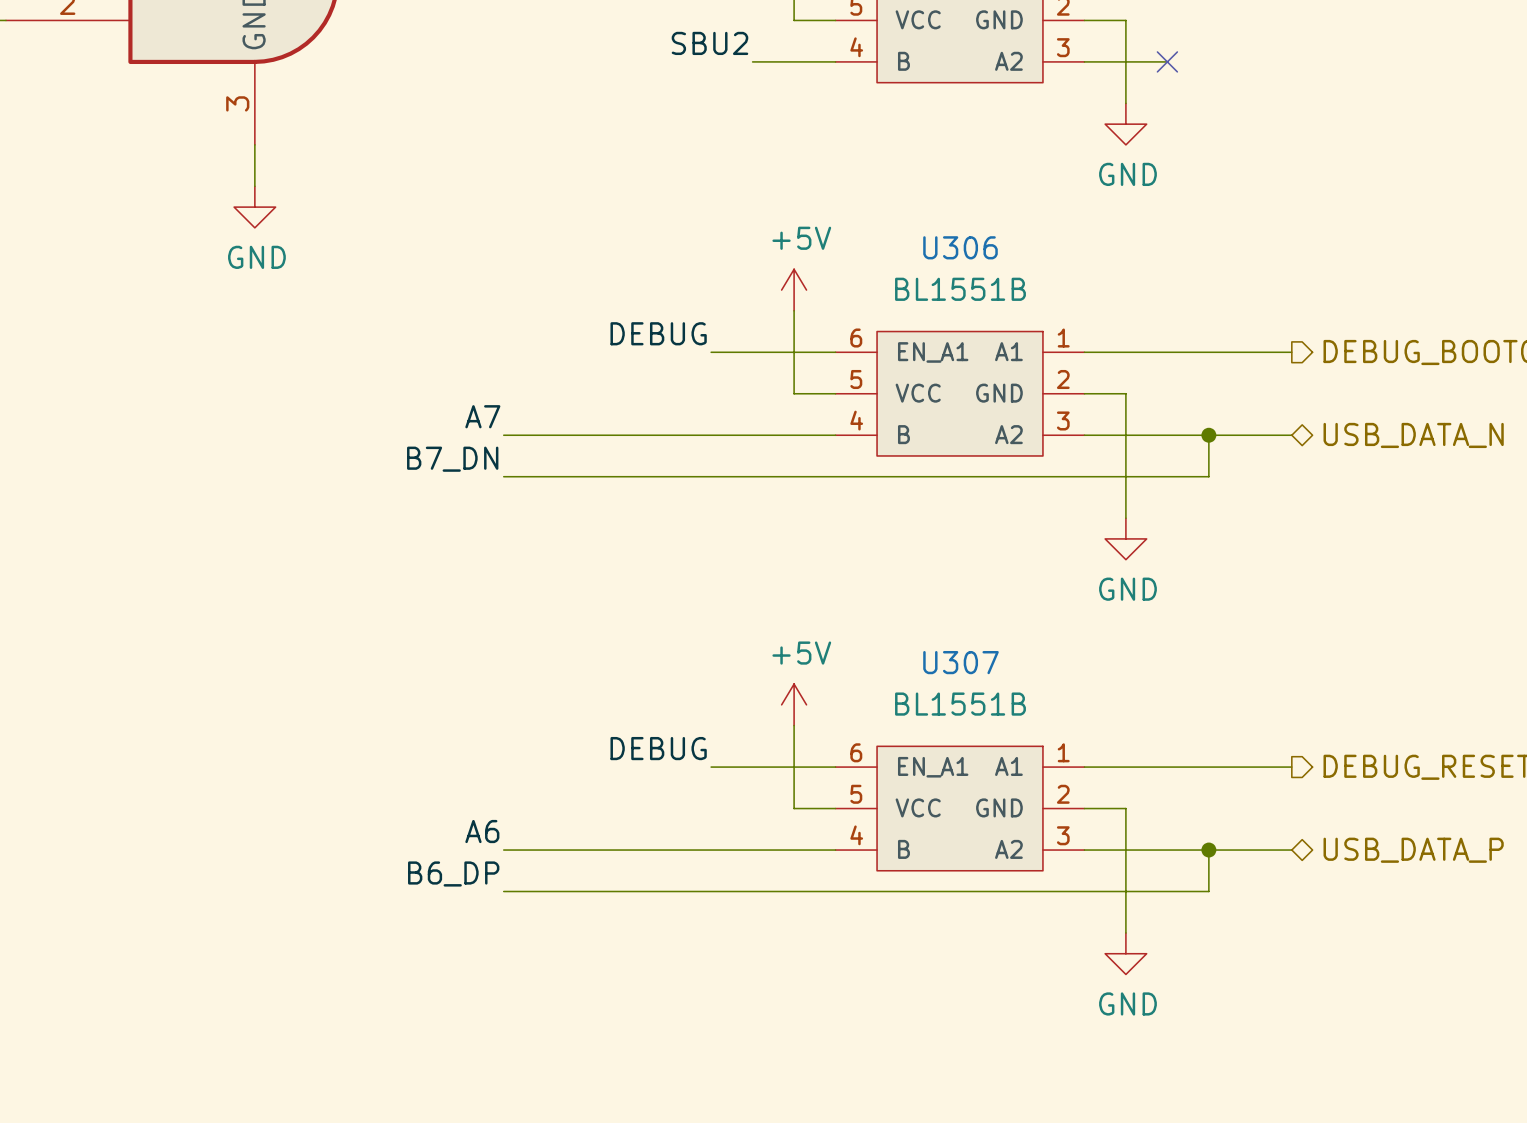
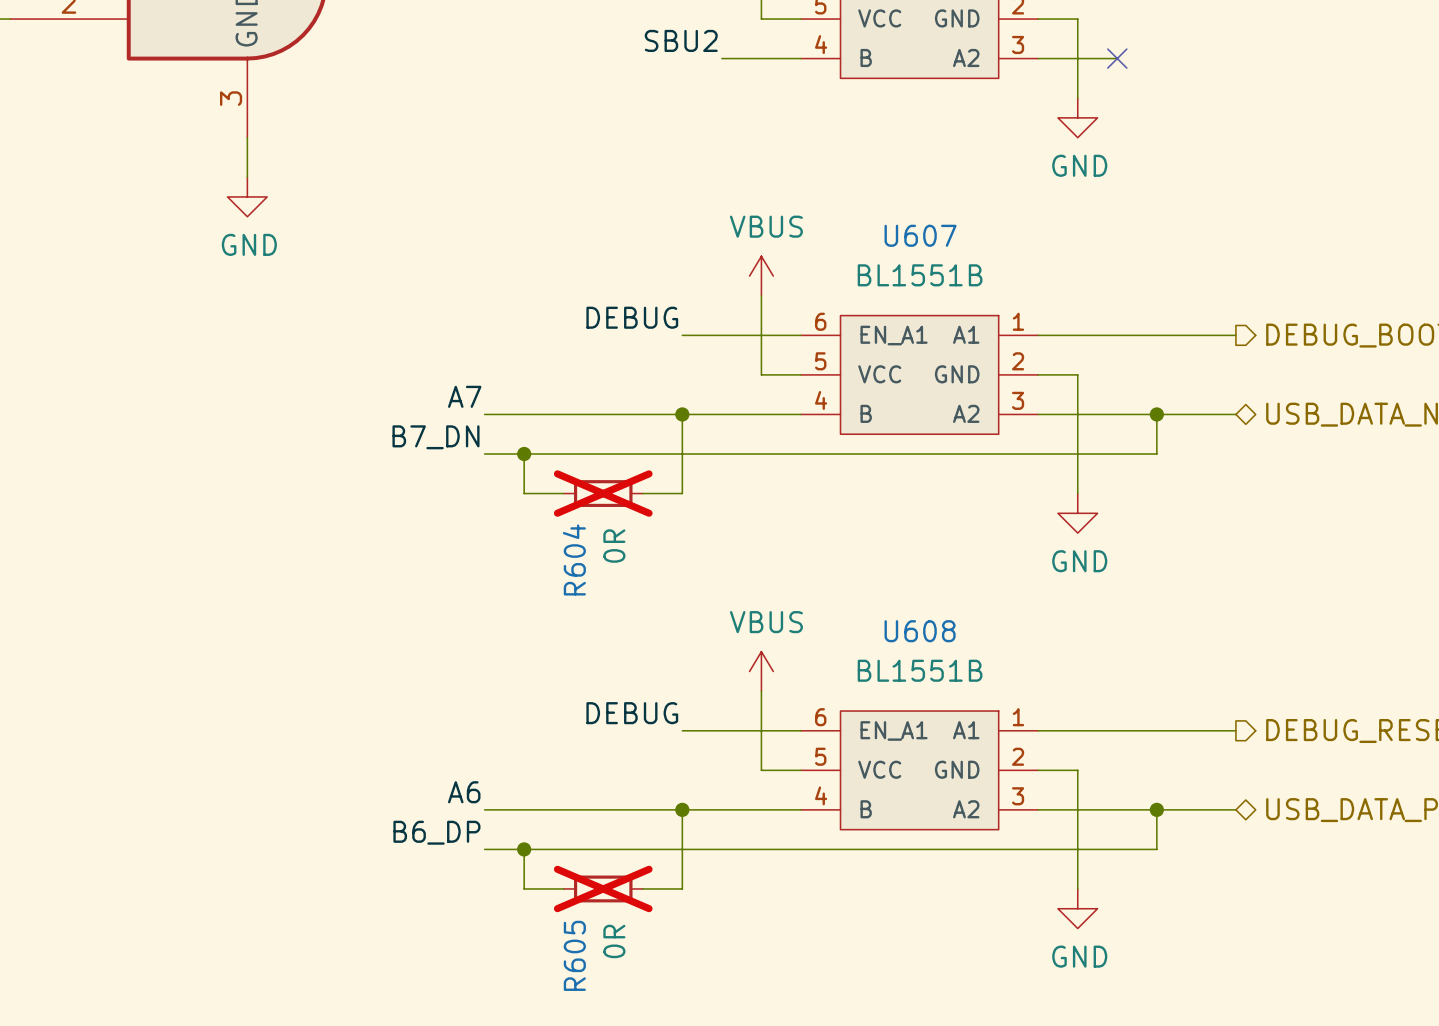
U306 name: U306 (960, 247) -> U607 (920, 235)
power symbol: +5V (794, 290) -> VBUS (761, 276)
wire: none -> (682, 414) (682, 493) (642, 493)
junction: none -> (682, 414)
wire: none -> (524, 454) (524, 493) (563, 493)
junction: none -> (524, 454)
R604: none -> 0R (603, 493)
U307 name: U307 (960, 662) -> U608 (920, 631)
power symbol: +5V (794, 704) -> VBUS (761, 671)
wire: none -> (682, 809) (682, 888) (642, 888)
junction: none -> (682, 809)
wire: none -> (524, 849) (524, 888) (563, 888)
junction: none -> (524, 849)
R605: none -> 0R (603, 888)

